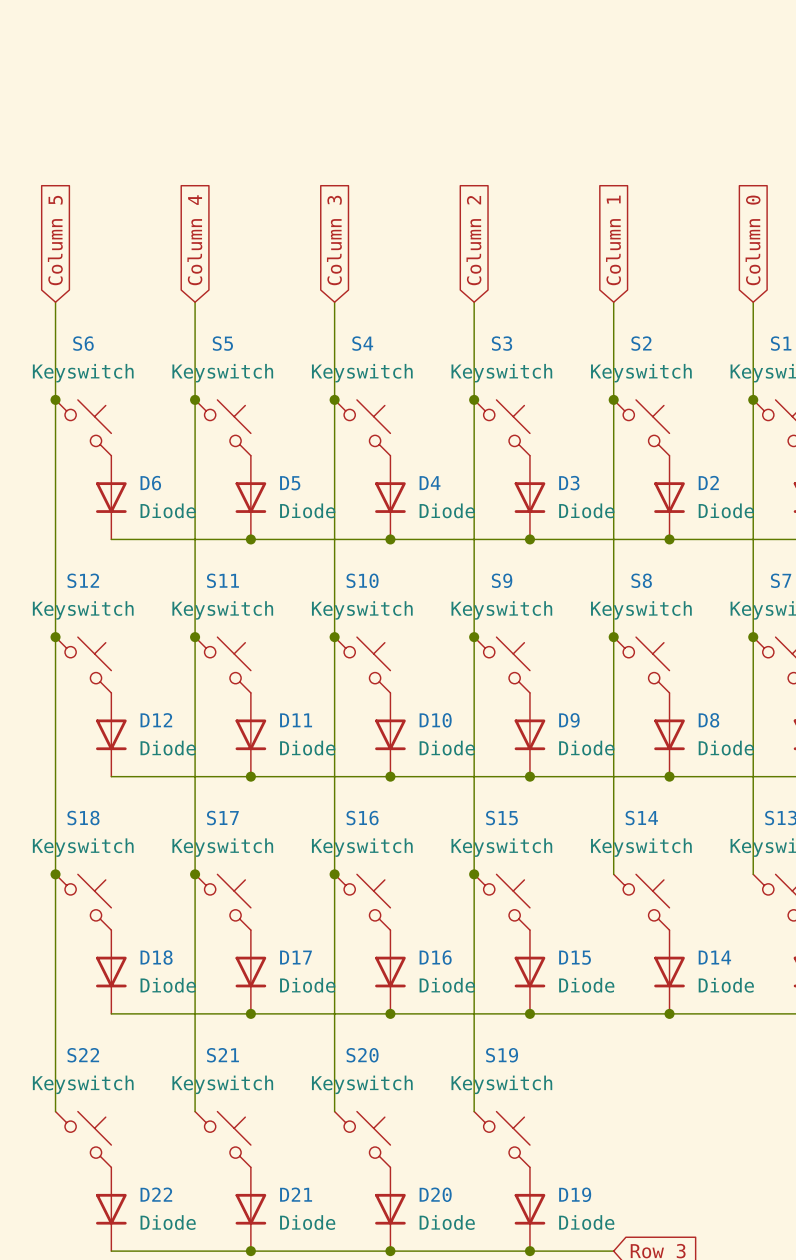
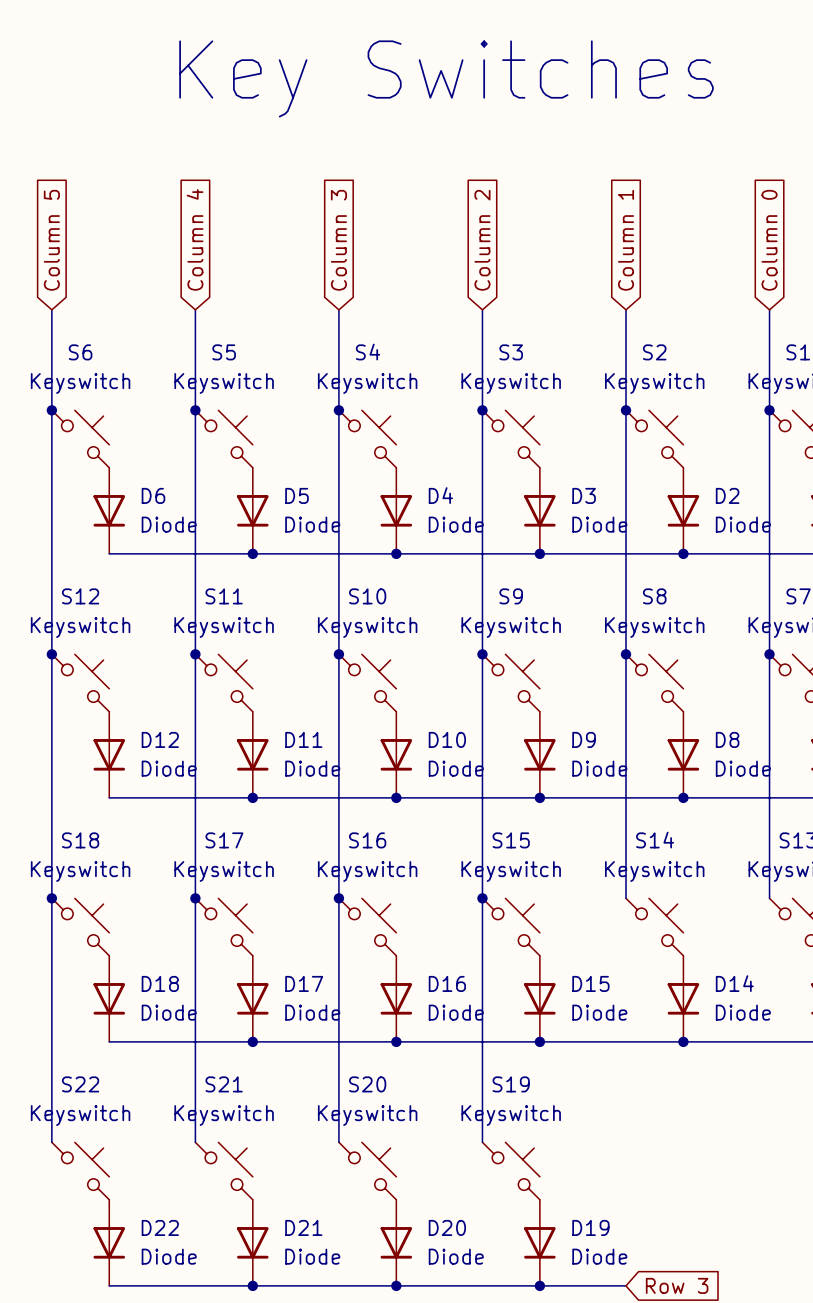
text: none -> Key Switches (446, 78)

